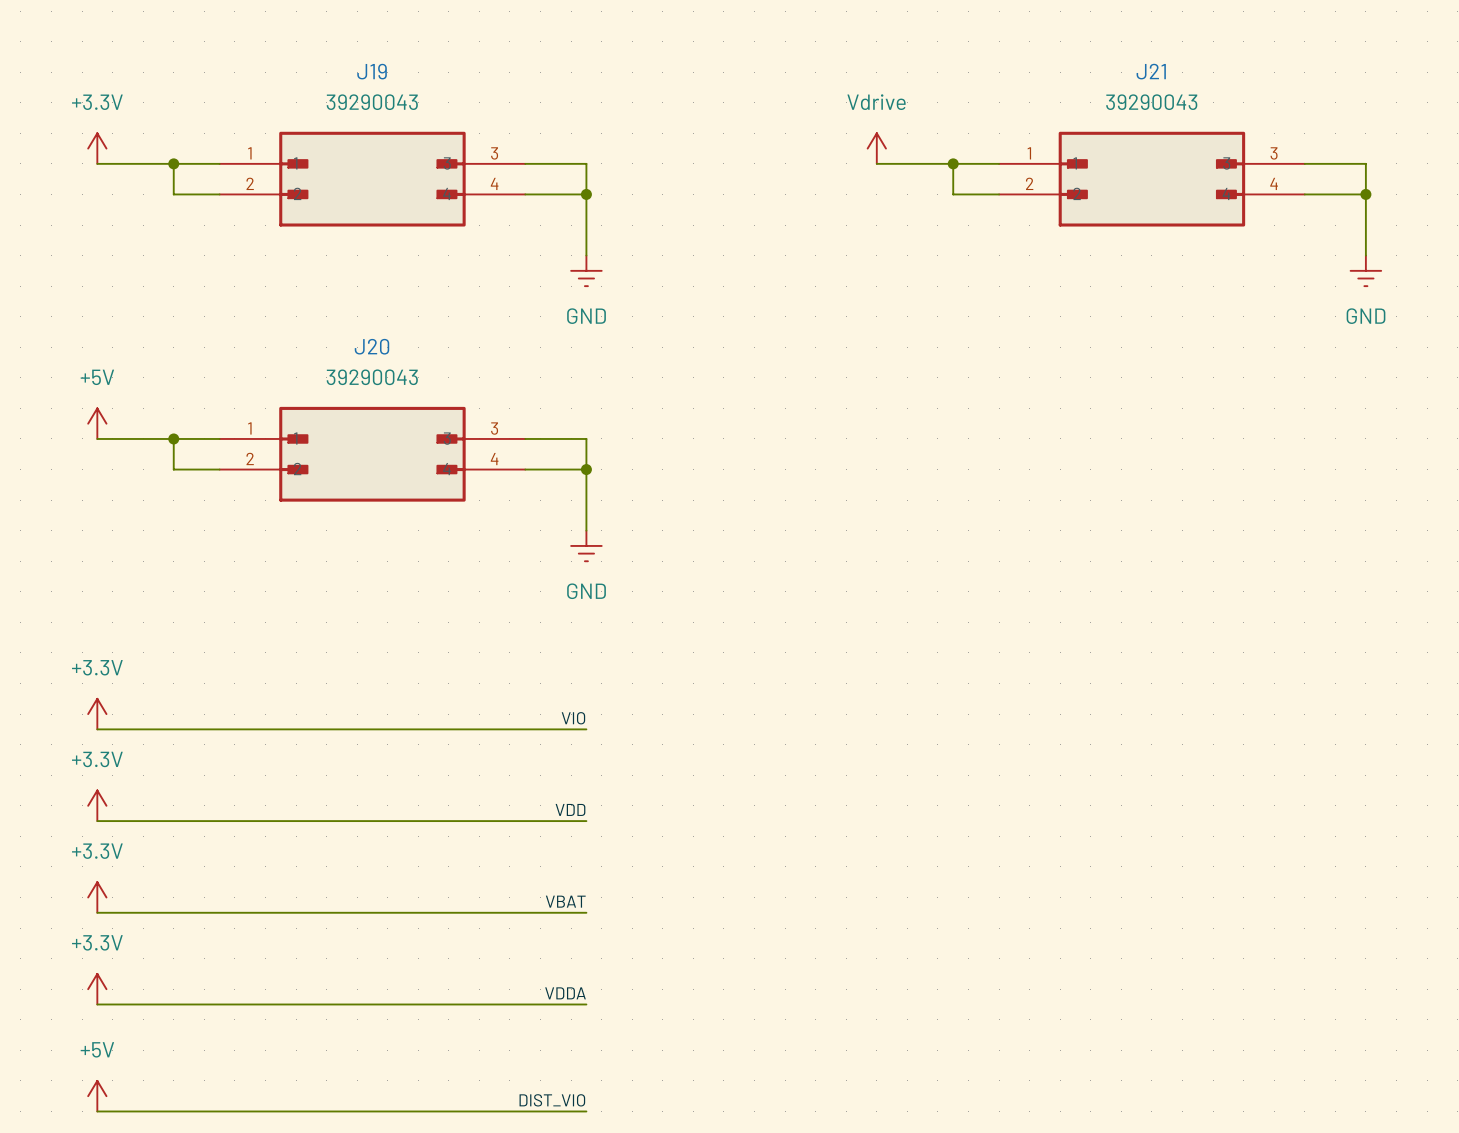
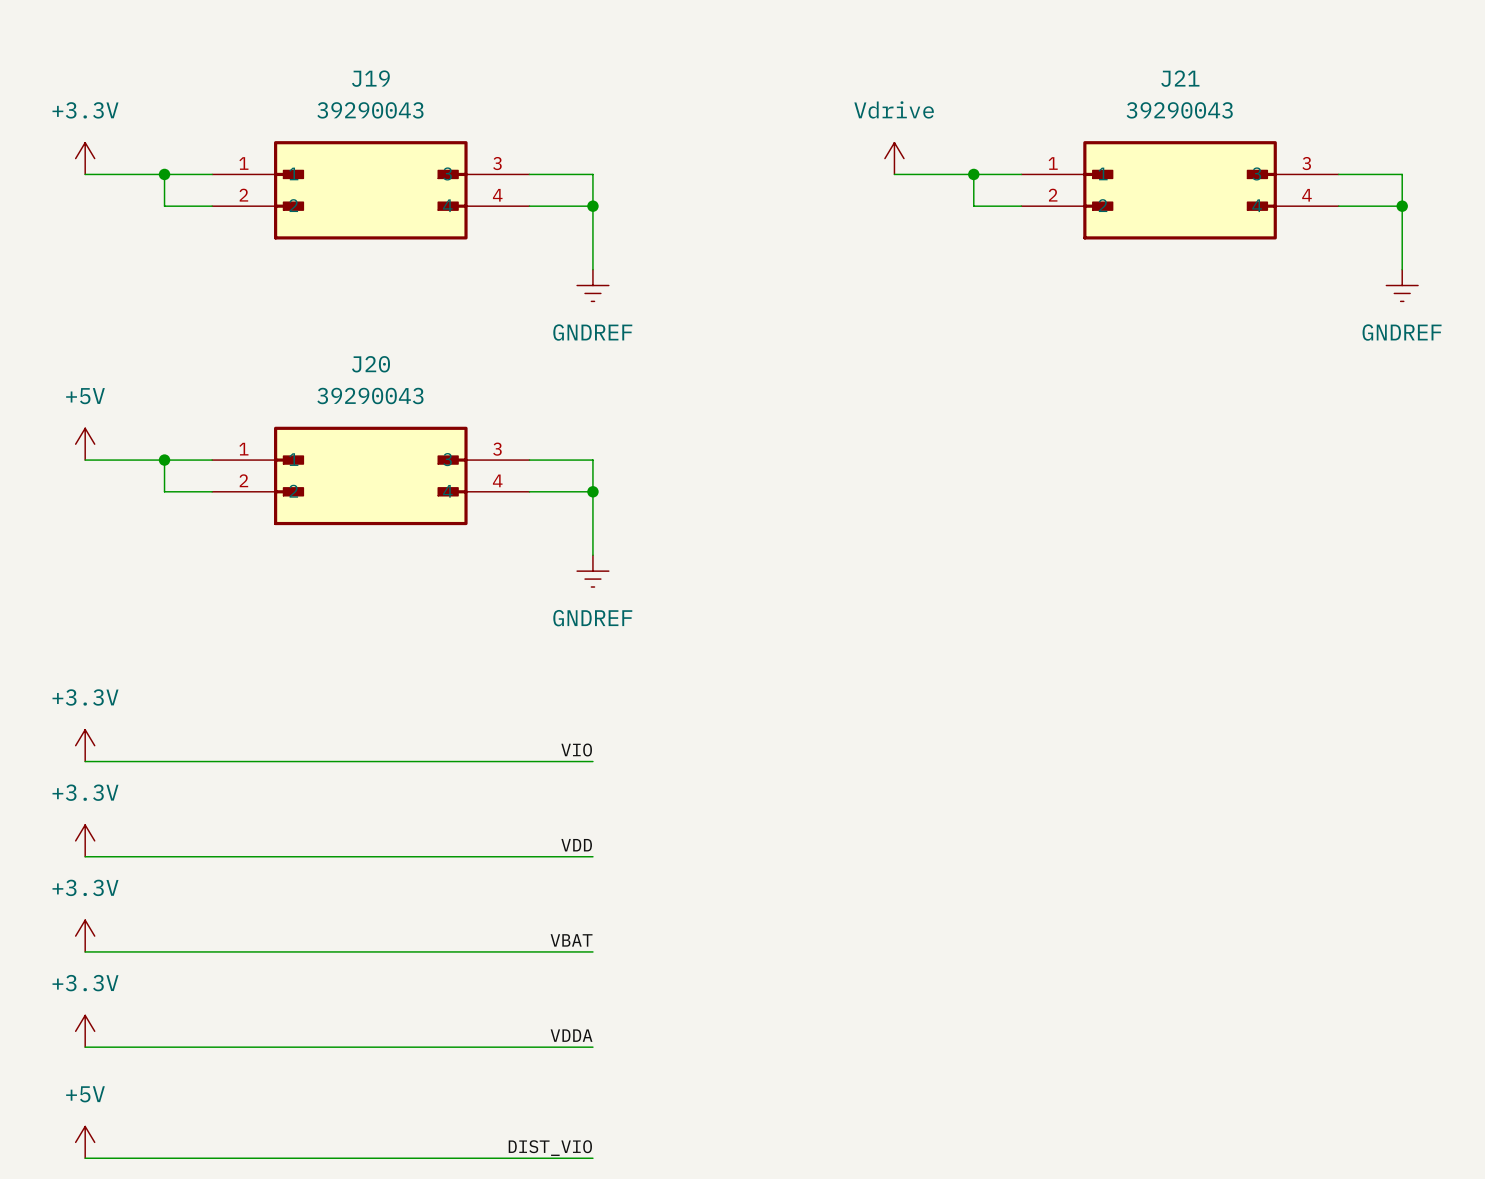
power symbol: GND (586, 270) -> GNDREF (592, 285)
power symbol: GND (1365, 270) -> GNDREF (1402, 285)
power symbol: GND (586, 545) -> GNDREF (592, 571)

